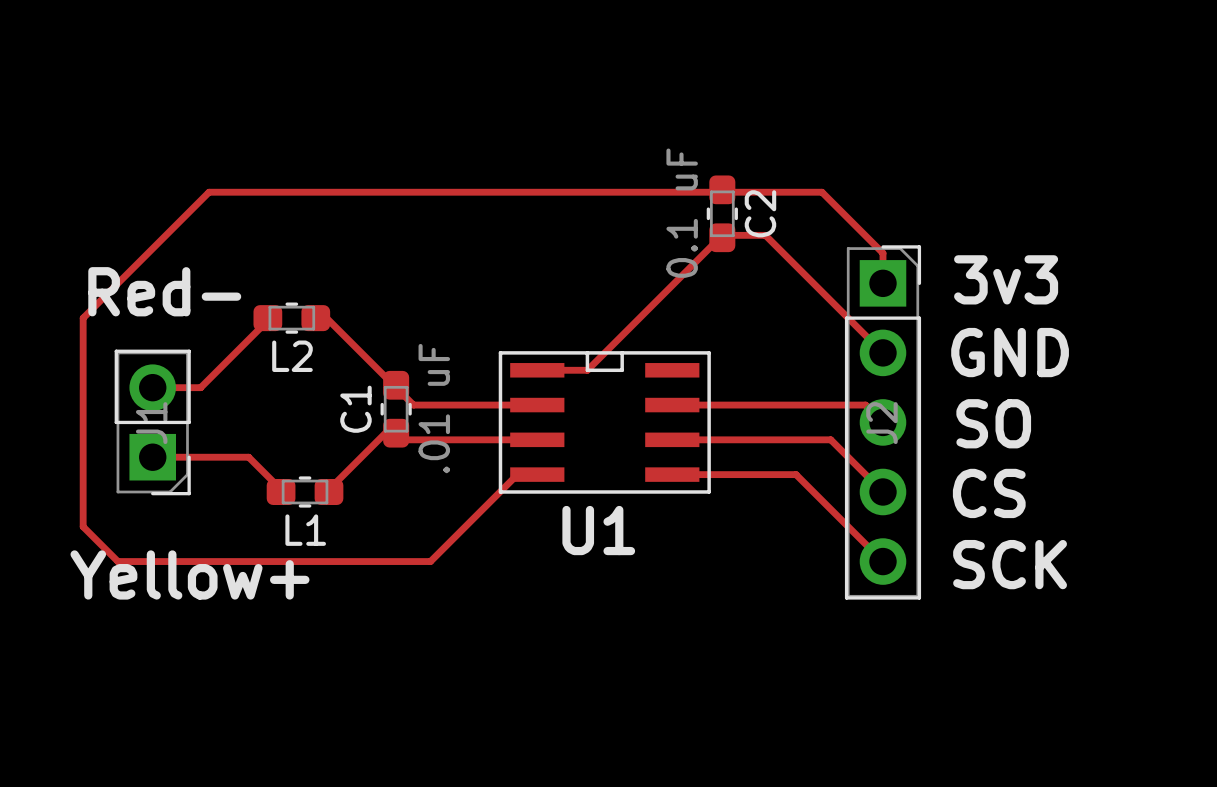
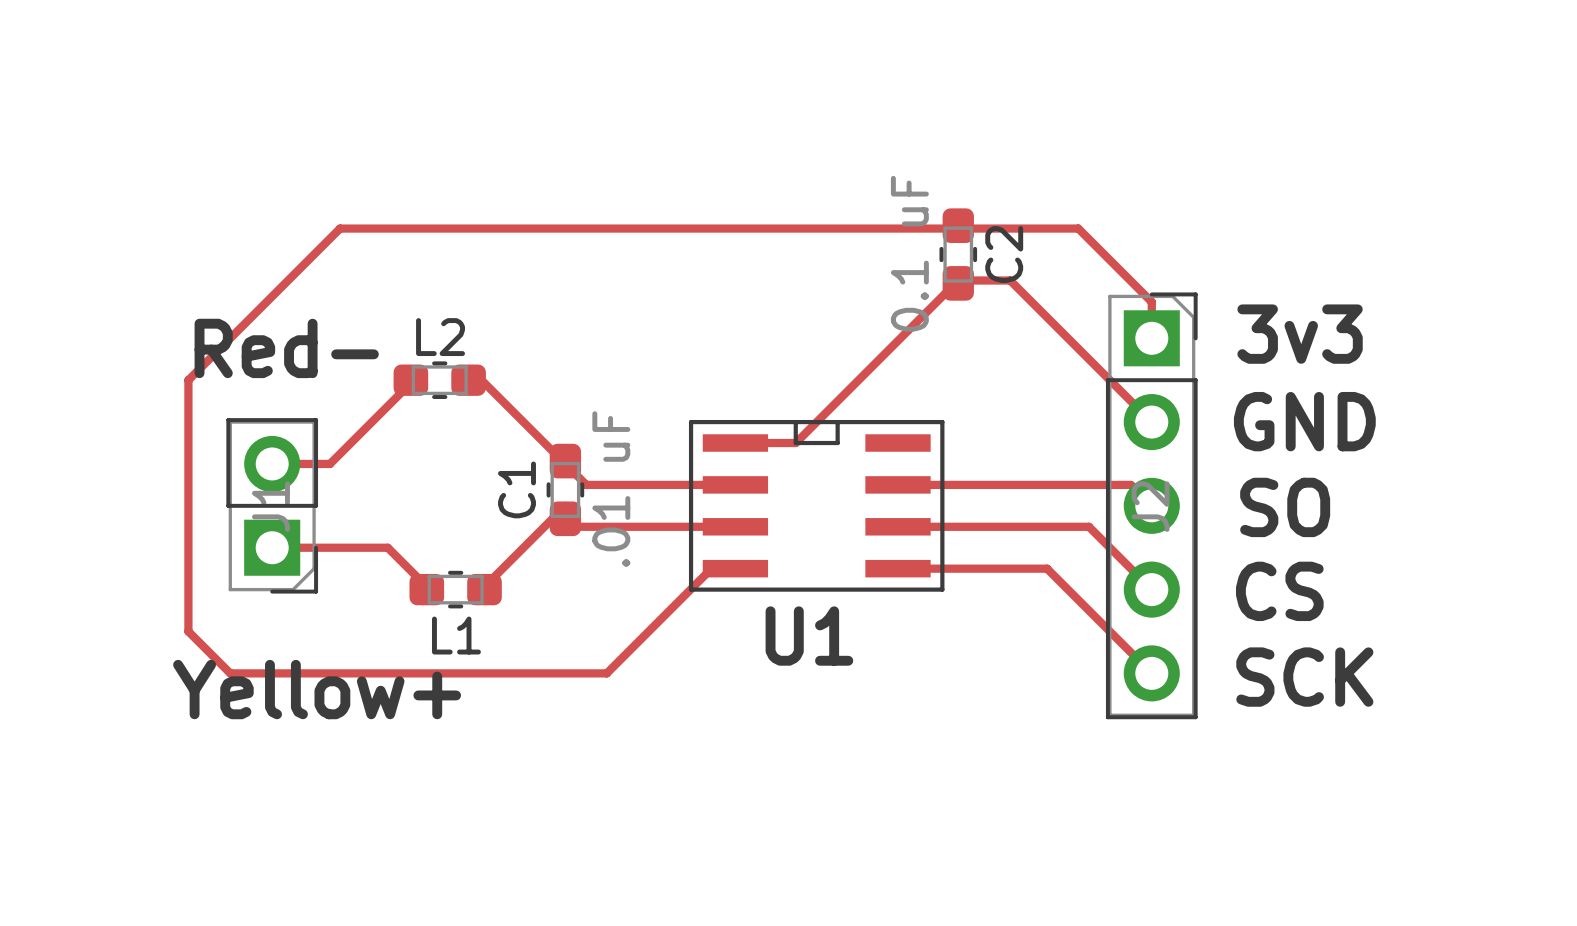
L2 name position: L2 (292, 356) -> L2 (440, 337)

